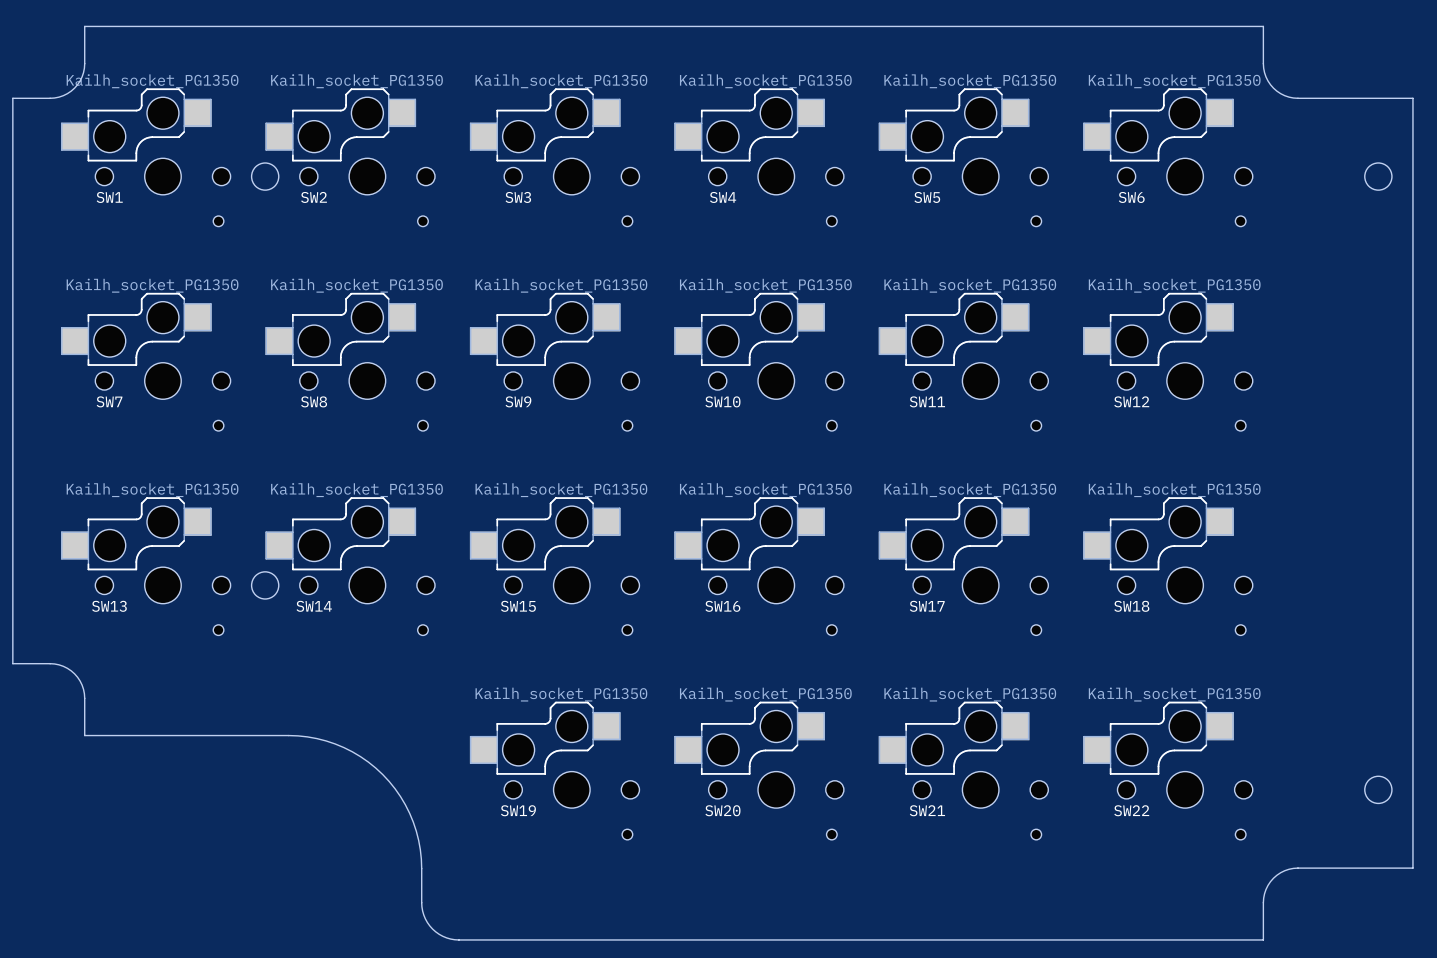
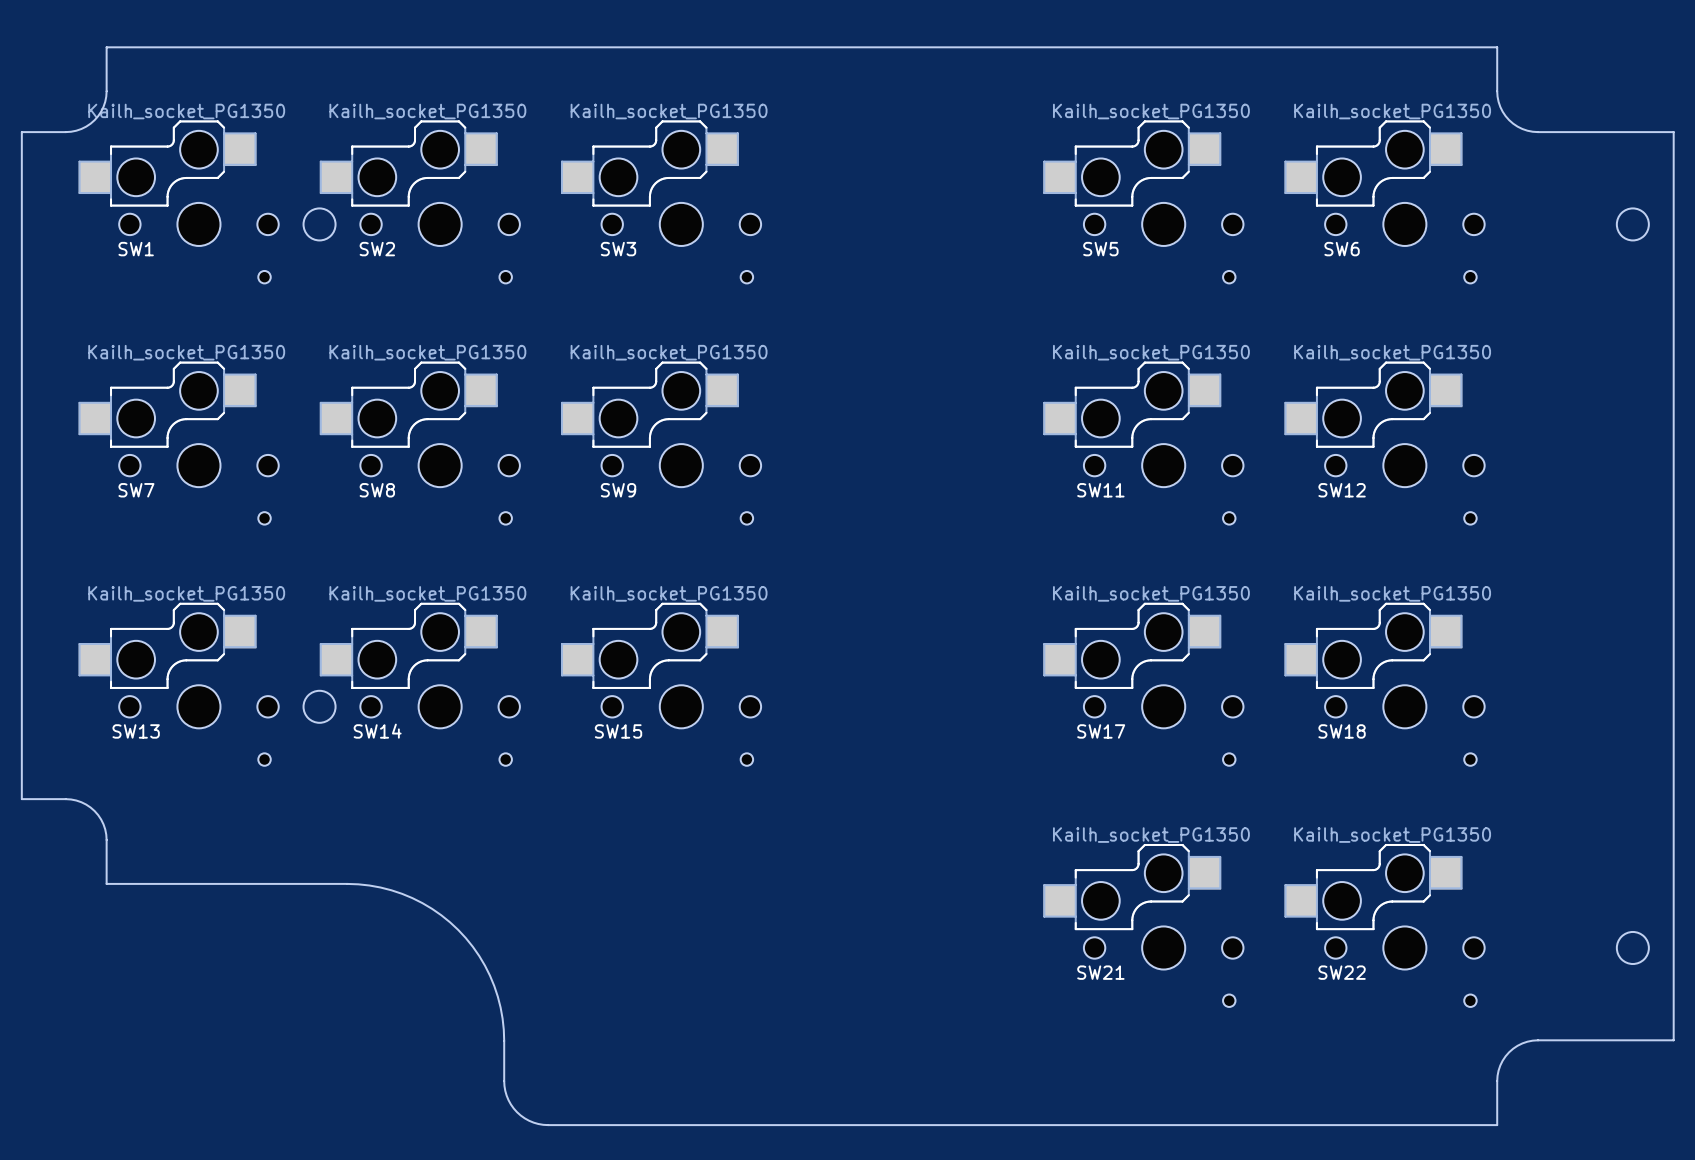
SW4: Kailh_socket_PG1350 (759, 157) -> none
SW10: Kailh_socket_PG1350 (759, 361) -> none
SW16: Kailh_socket_PG1350 (759, 566) -> none
SW19: Kailh_socket_PG1350 (554, 770) -> none
SW20: Kailh_socket_PG1350 (759, 770) -> none

